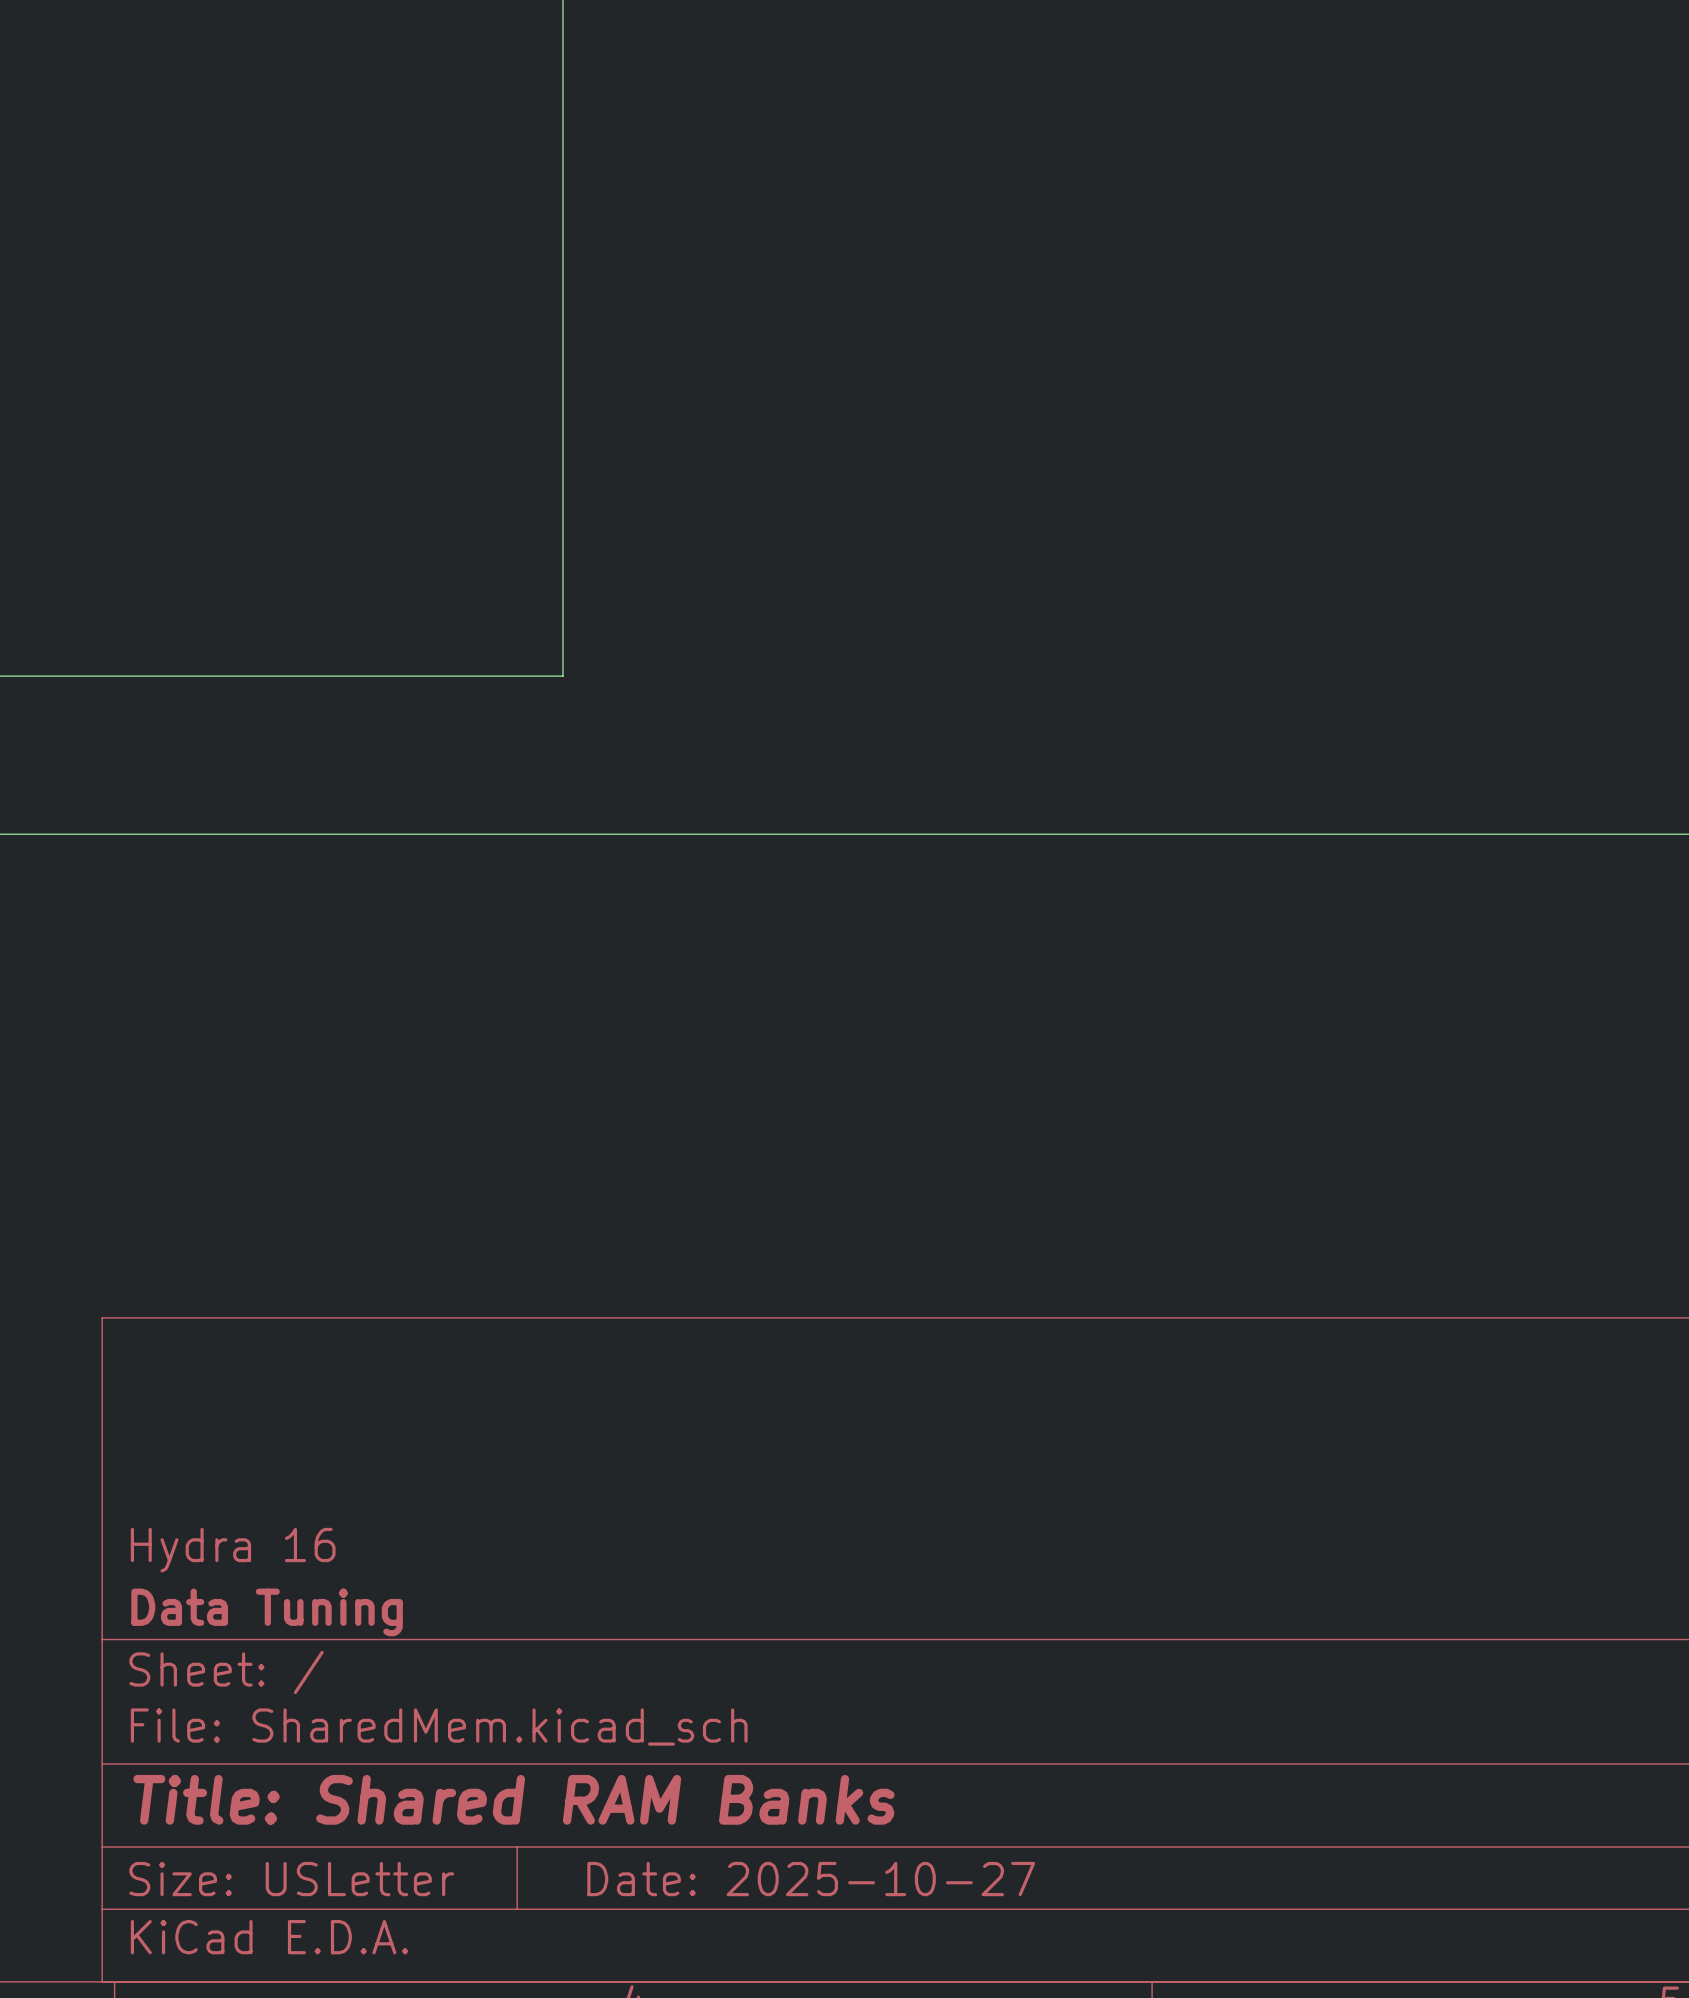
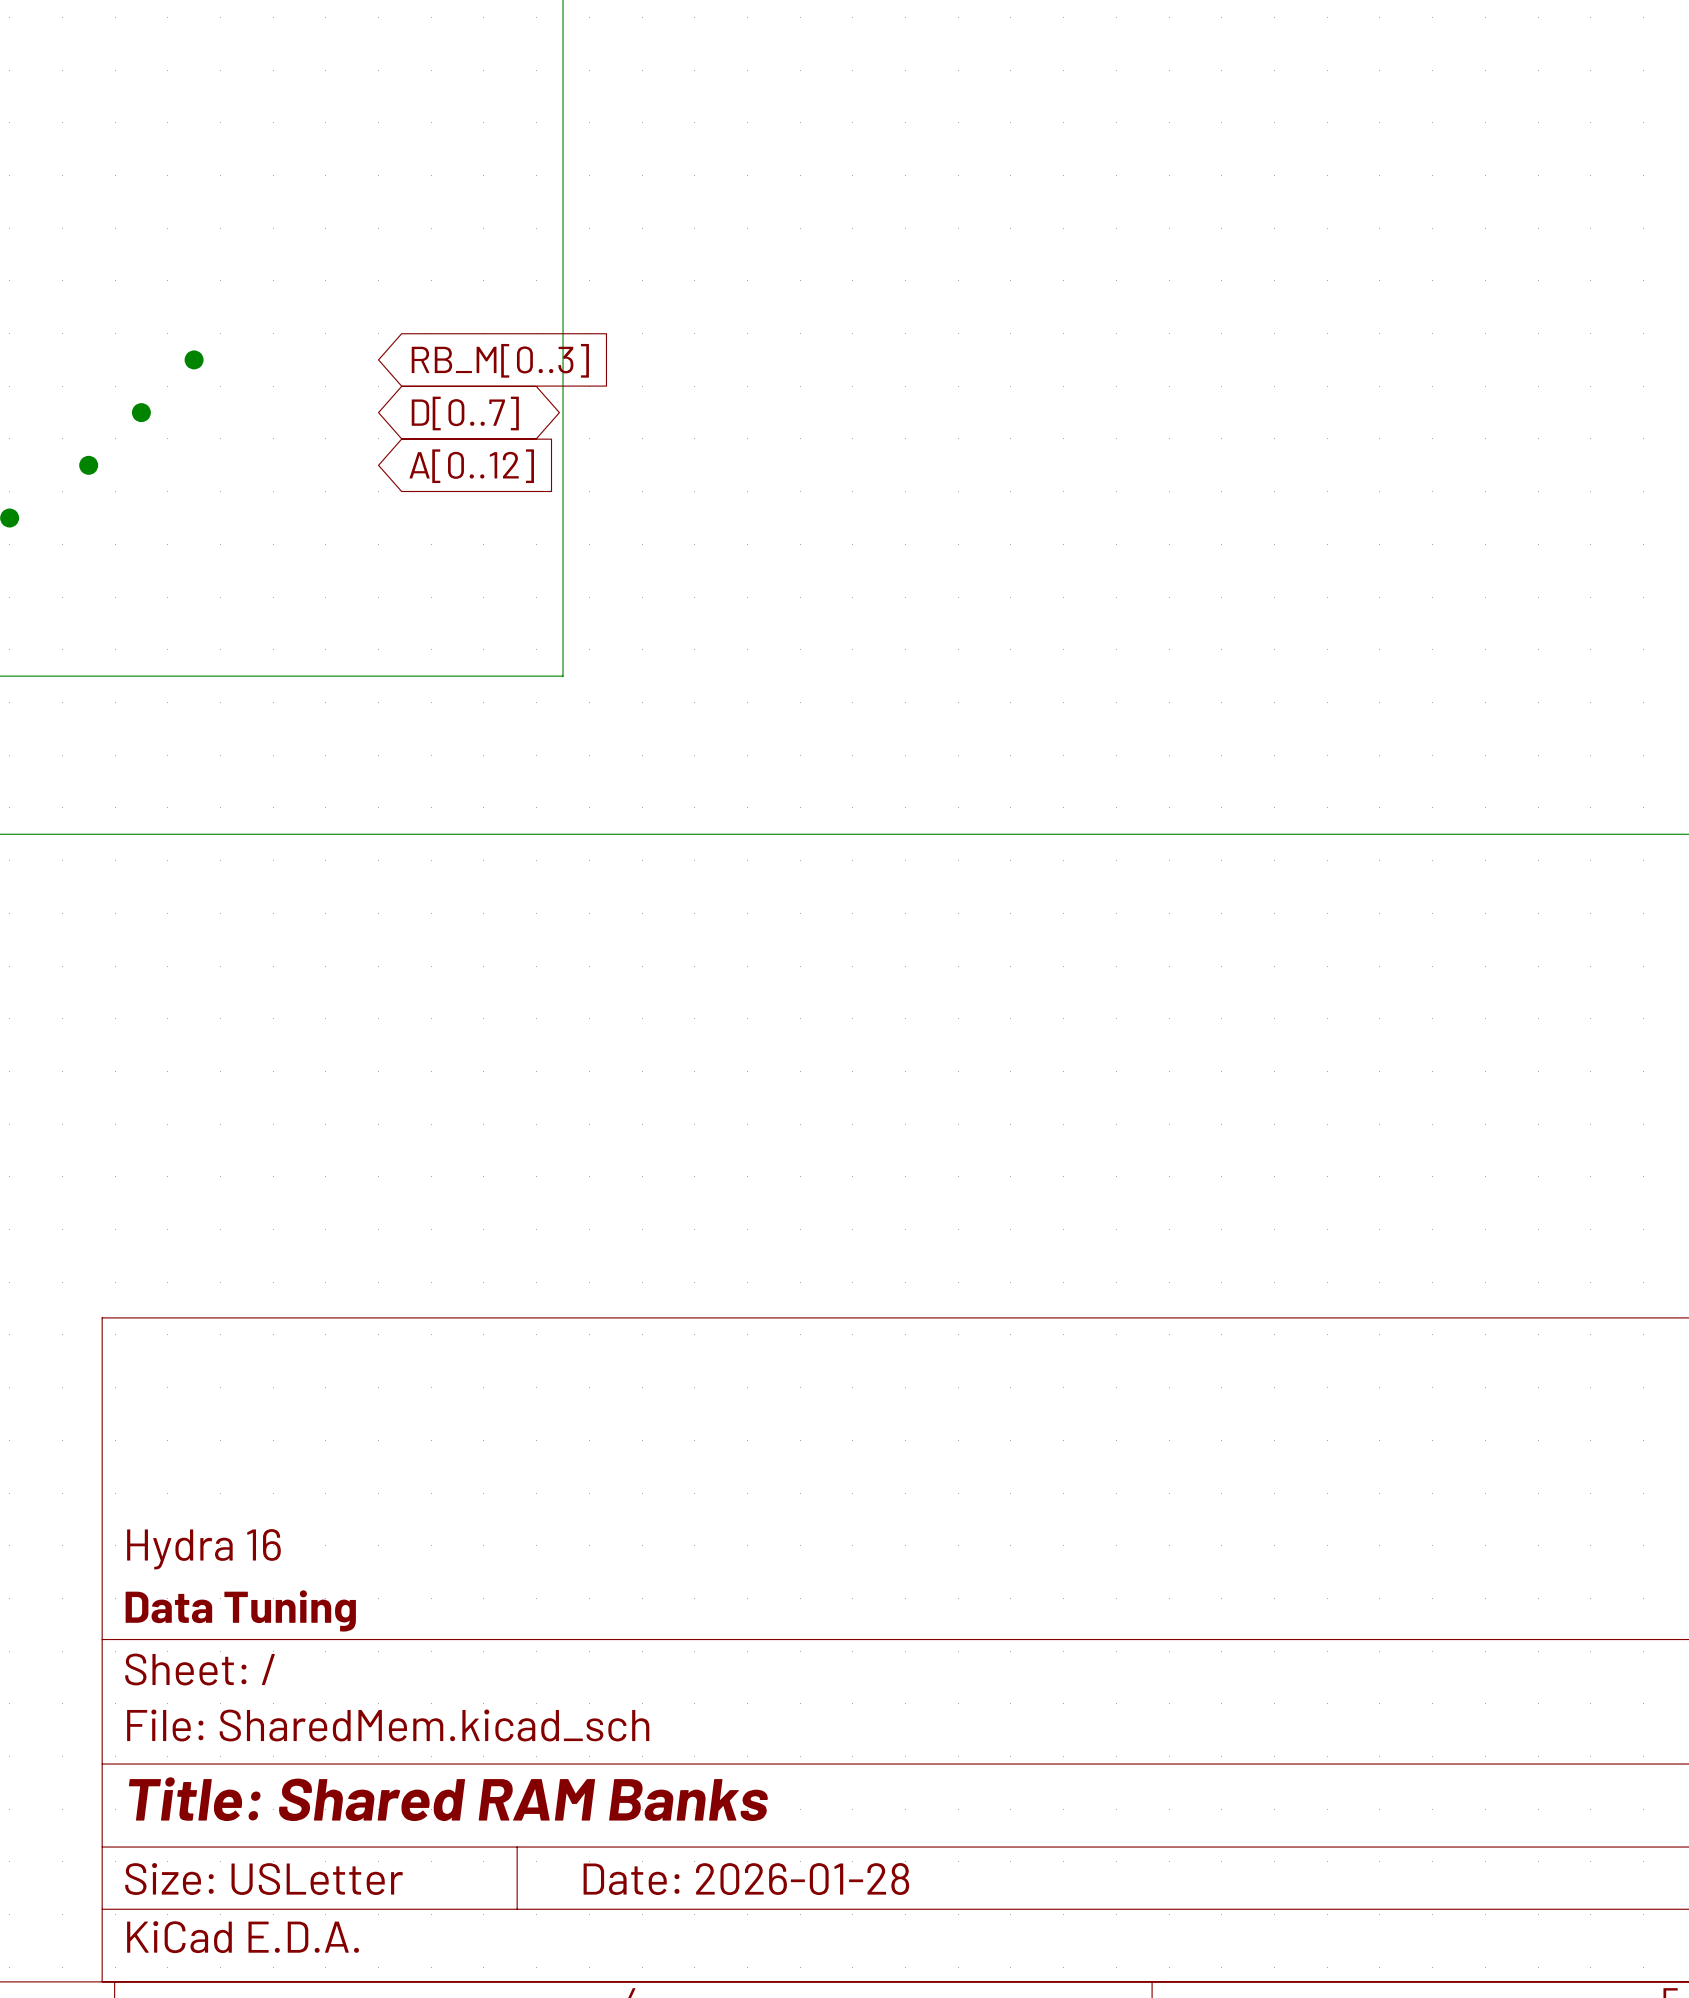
junction: none -> (194, 359)
global label: none -> RB_M[0..3] (500, 360)
junction: none -> (141, 412)
global label: none -> D[0..7] (465, 413)
junction: none -> (88, 465)
global label: none -> A[0..12] (471, 466)
junction: none -> (9, 518)
title block: Date: 2025-10-27 (811, 1879) -> Date: 2026-01-28 (746, 1879)

